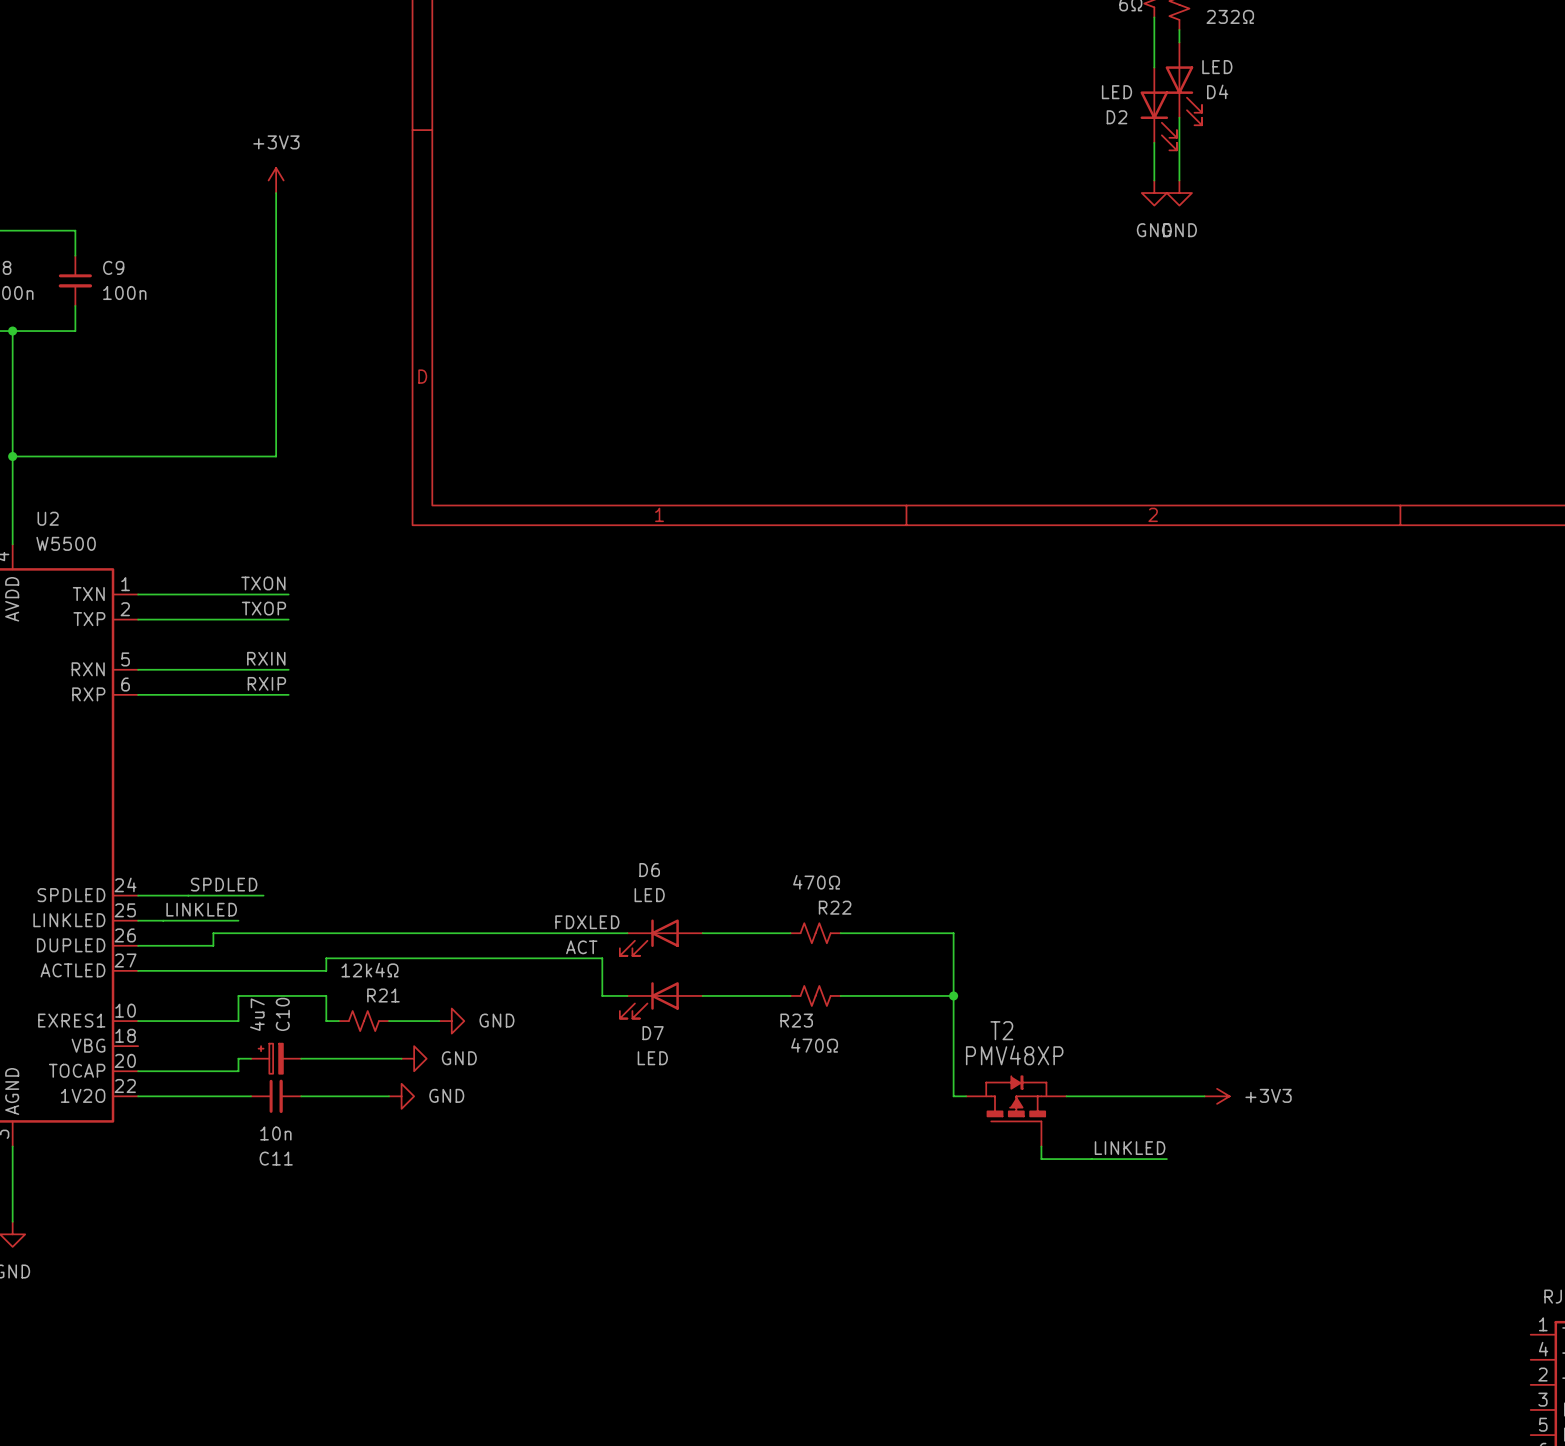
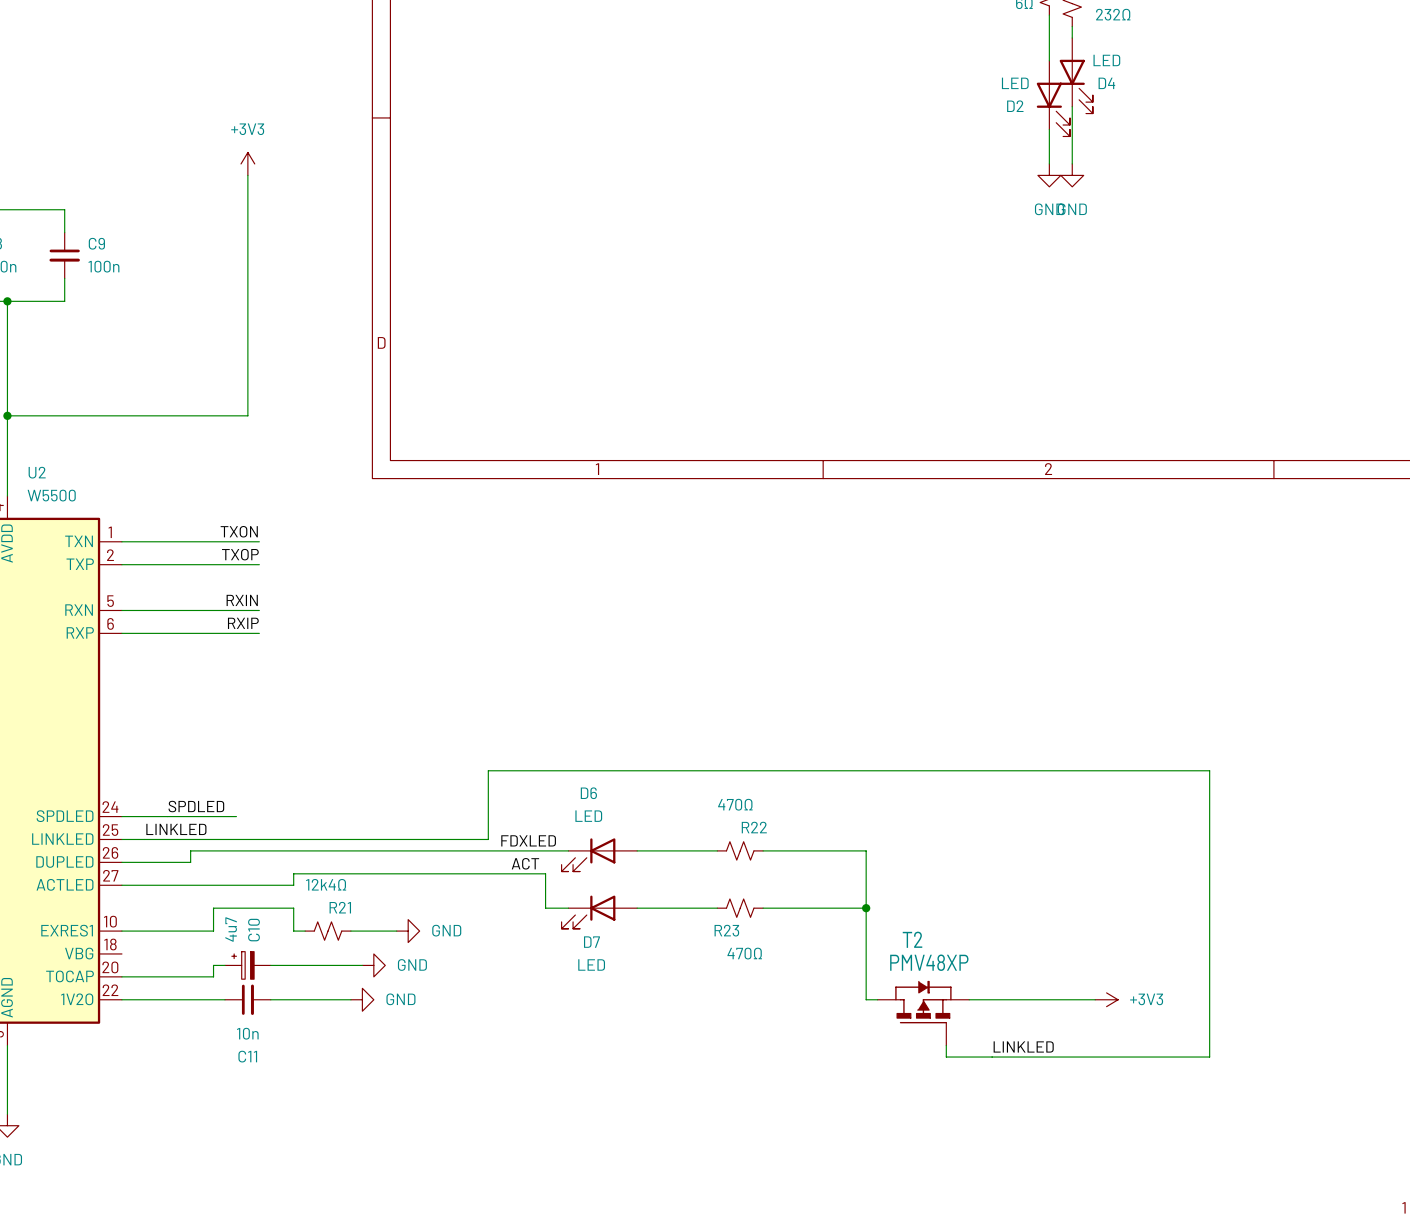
wire: none -> (213, 839) (488, 839) (488, 770) (1209, 770) (1209, 1057) (1060, 1057)

